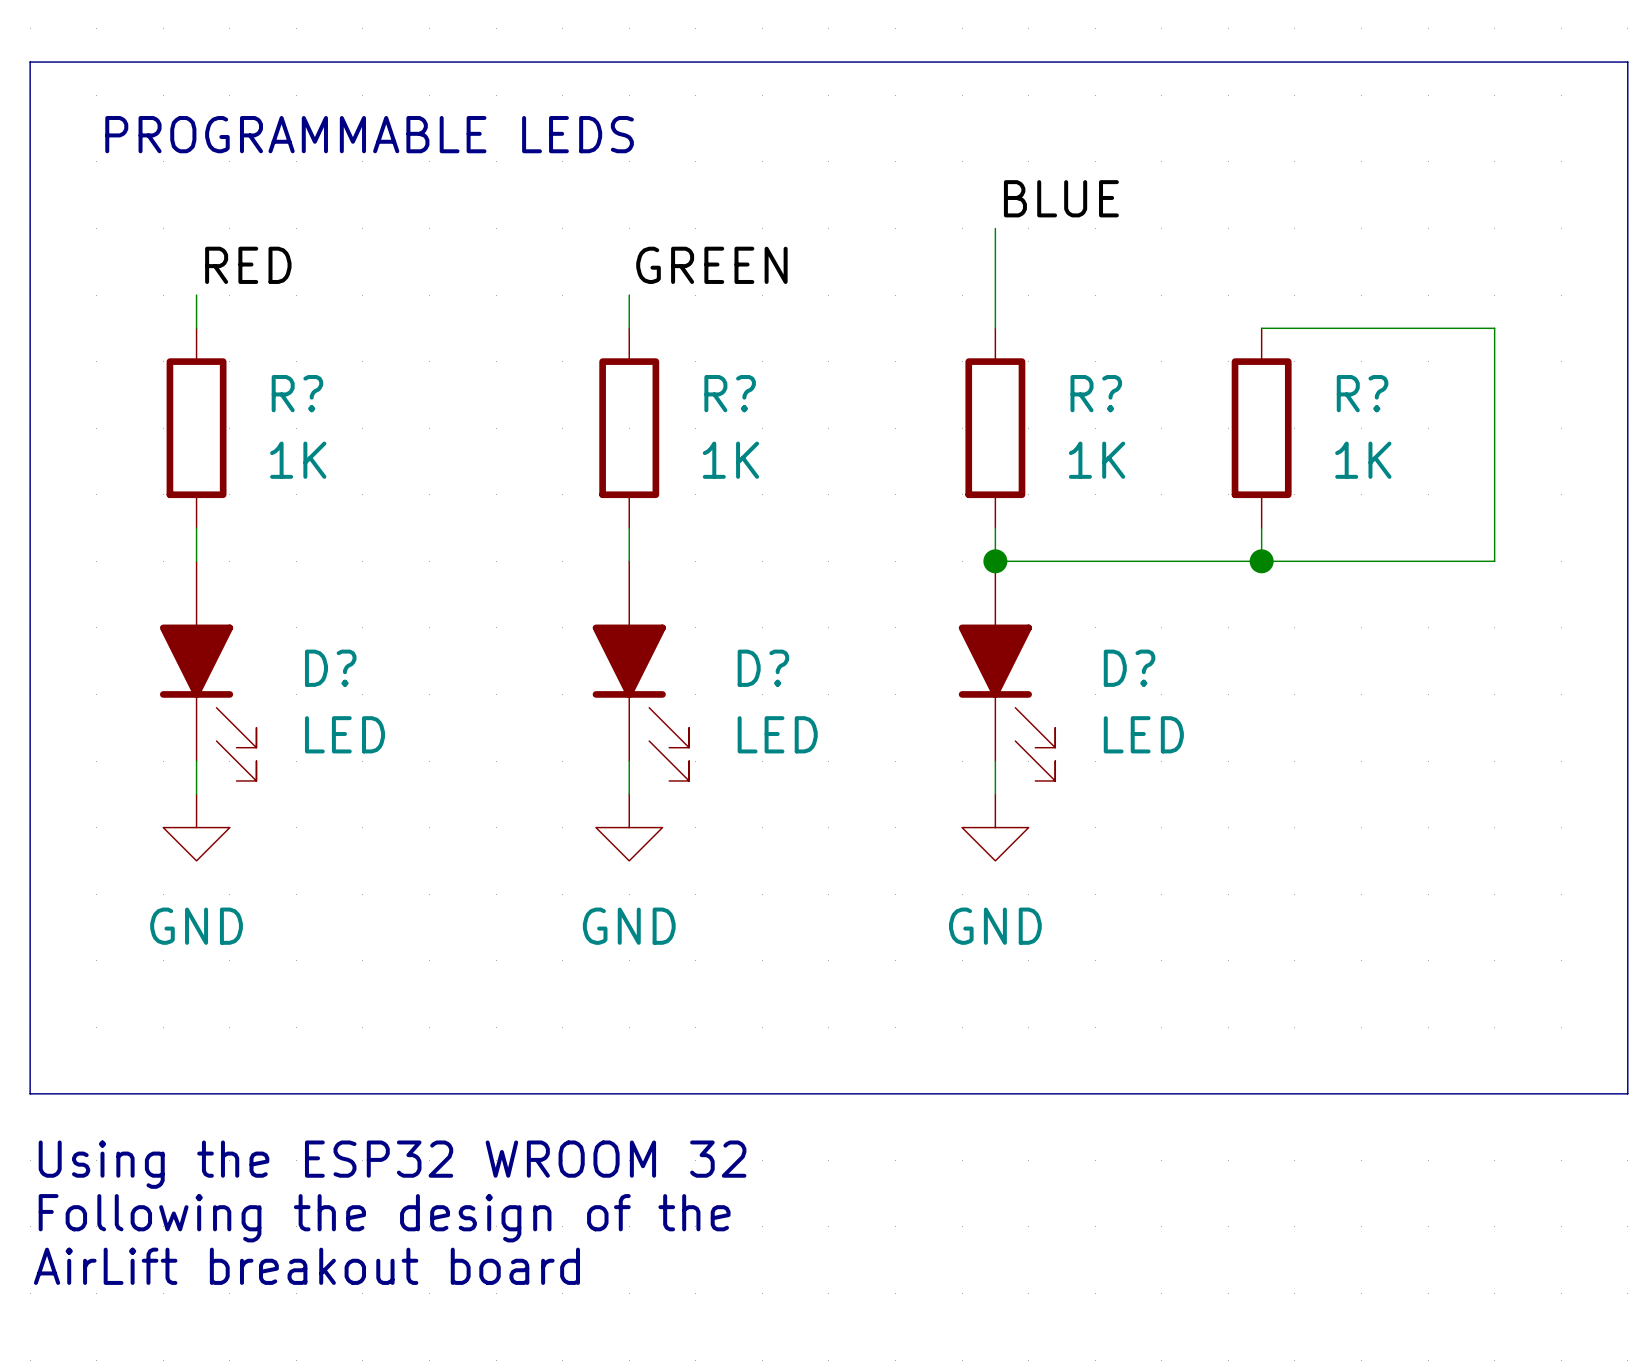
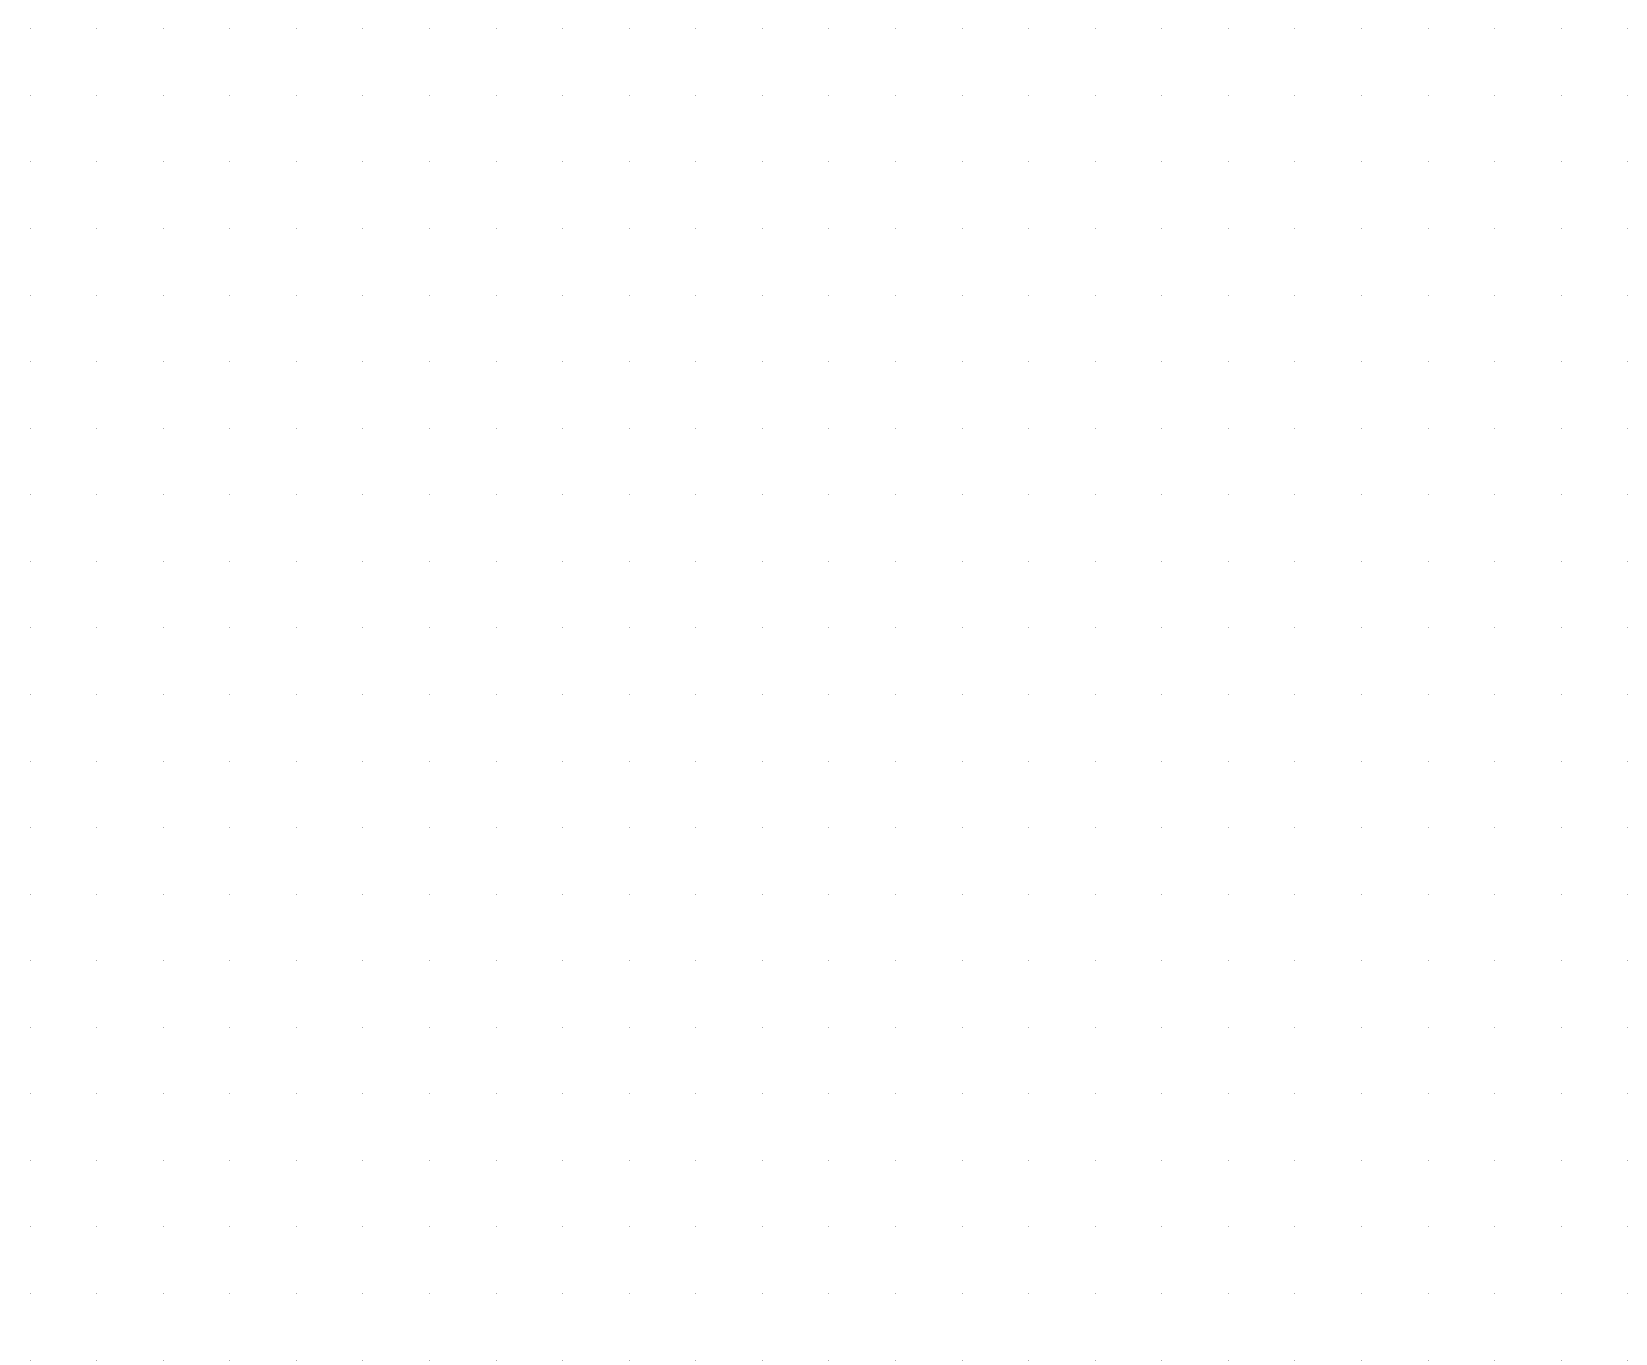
line: (30, 62) (1627, 62) (1627, 1093) (30, 1093) (30, 62) -> none
text: PROGRAMMABLE LEDS (369, 134) -> none
label: BLUE (1061, 198) -> none
wire: (995, 228) (995, 328) -> none
label: RED (248, 265) -> none
label: GREEN (711, 265) -> none
wire: (196, 295) (196, 328) -> none
wire: (629, 295) (629, 328) -> none
wire: (1261, 328) (1494, 328) (1494, 561) (995, 561) (995, 528) -> none
R?: 1K (196, 428) -> none
R?: 1K (629, 428) -> none
R?: 1K (995, 428) -> none
R?: 1K (1261, 428) -> none
wire: (196, 528) (196, 561) -> none
wire: (629, 528) (629, 561) -> none
wire: (1261, 528) (1261, 561) -> none
junction: (995, 561) -> none
junction: (1261, 561) -> none
D?: LED (208, 671) -> none
D?: LED (640, 671) -> none
D?: LED (1007, 671) -> none
wire: (196, 761) (196, 794) -> none
wire: (629, 761) (629, 794) -> none
wire: (995, 761) (995, 794) -> none
power symbol: GND (196, 827) -> none
power symbol: GND (629, 827) -> none
power symbol: GND (995, 827) -> none
text: Using the ESP32 WROOM 32 (392, 1164) -> none
text: Following the design of the (384, 1218) -> none
text: AirLift breakout board (306, 1266) -> none

